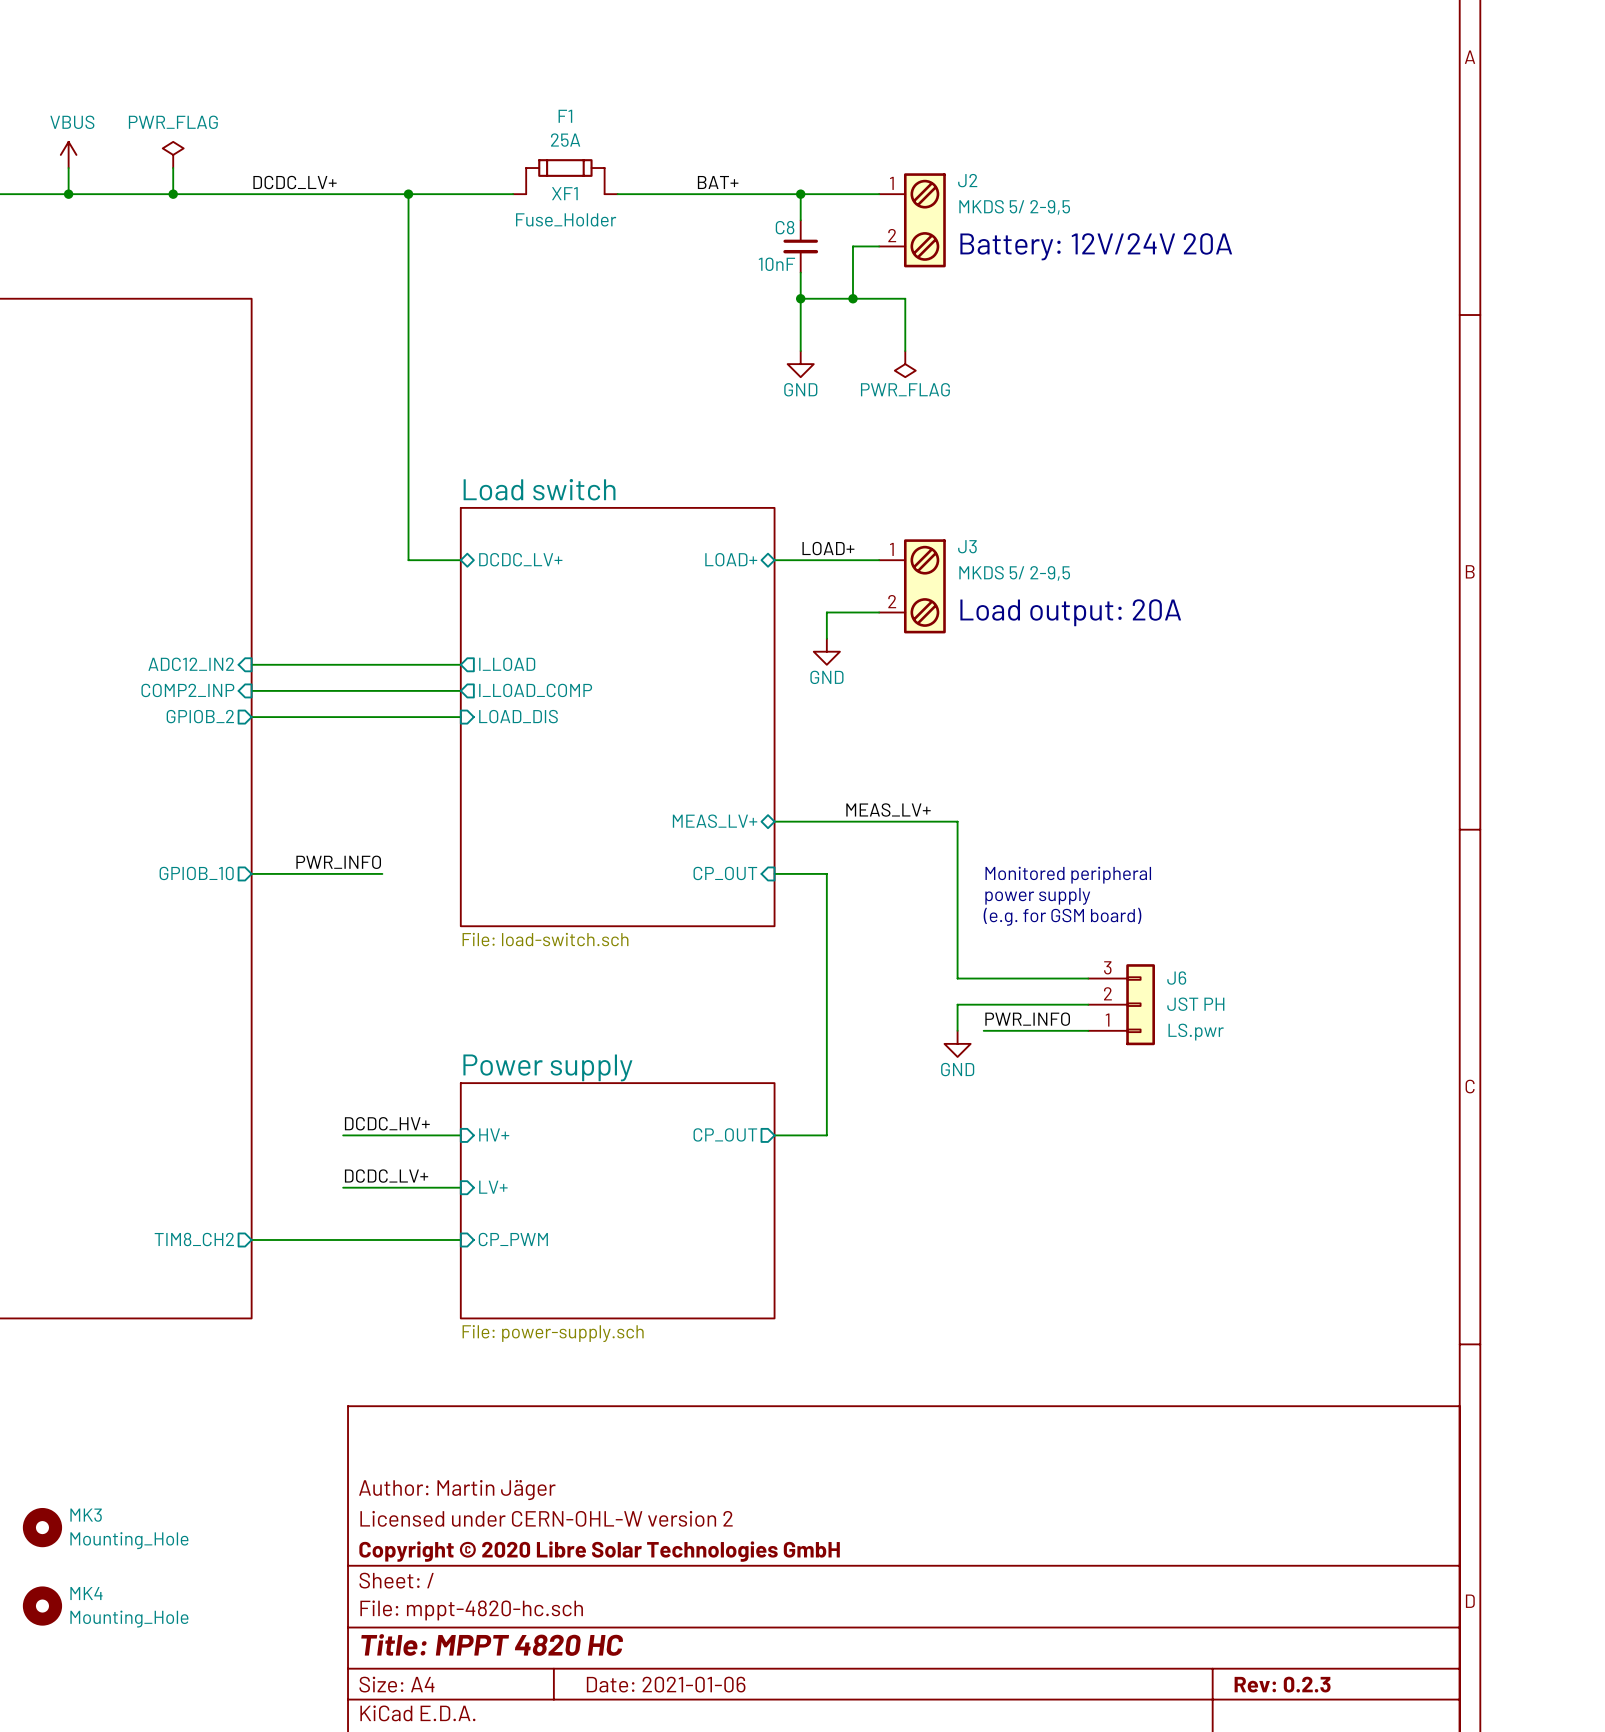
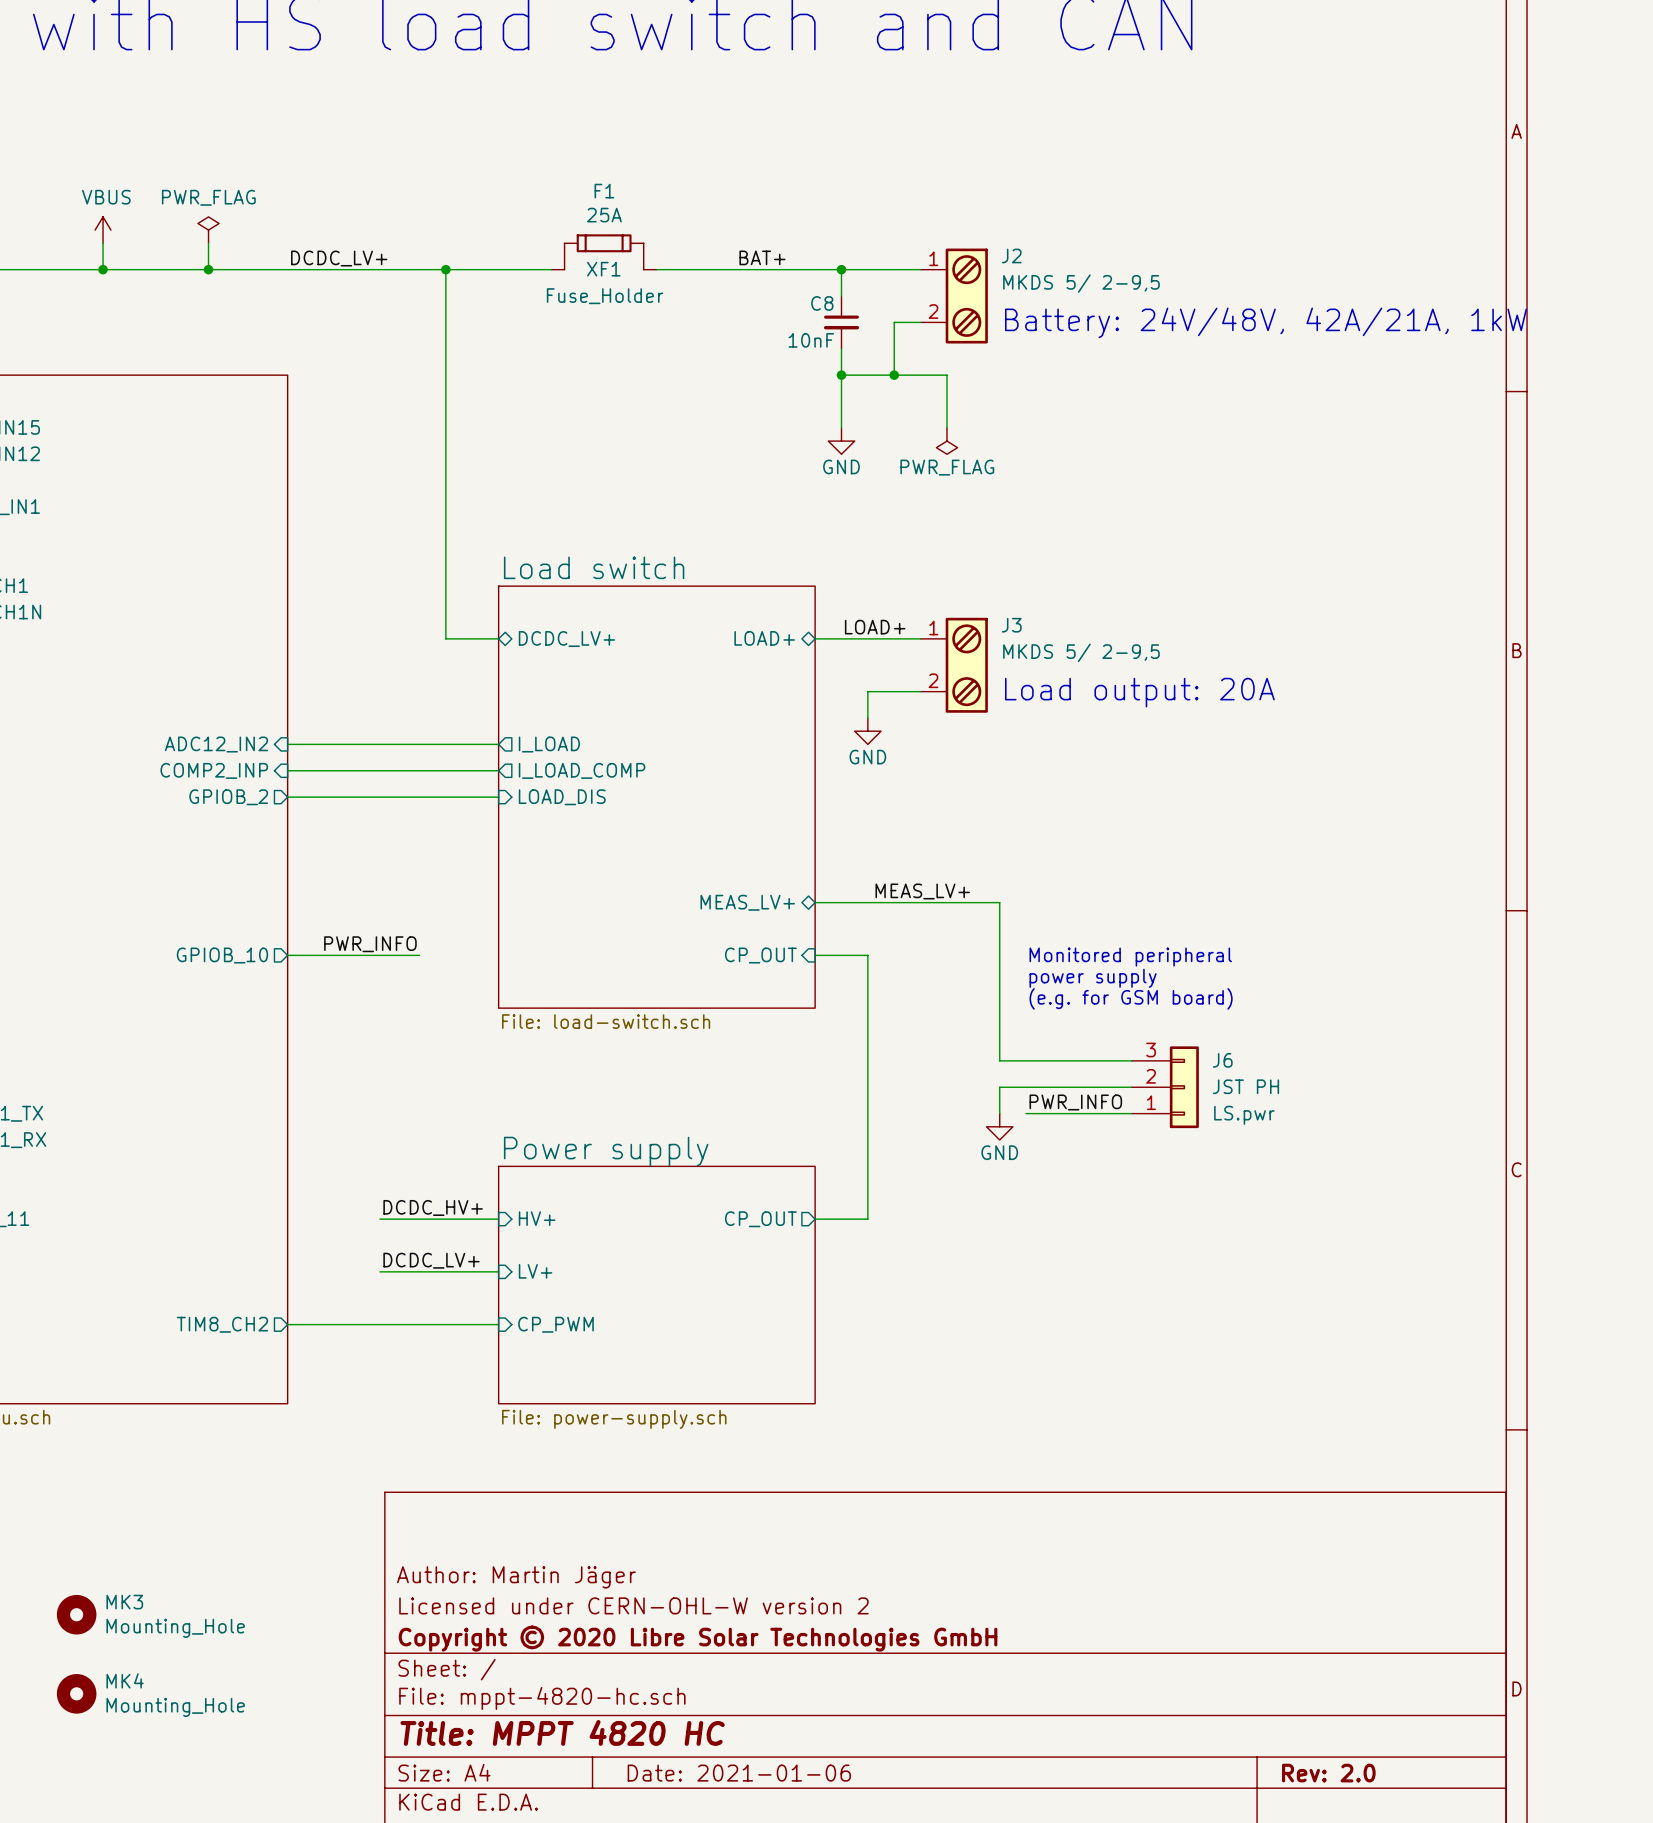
text: Battery: 12V/24V 20A (1096, 246) -> Battery: 24V/48V, 42A/21A, 1kW (1266, 322)
title block: Rev: 0.2.3 (1282, 1684) -> Rev: 2.0 (1328, 1773)

